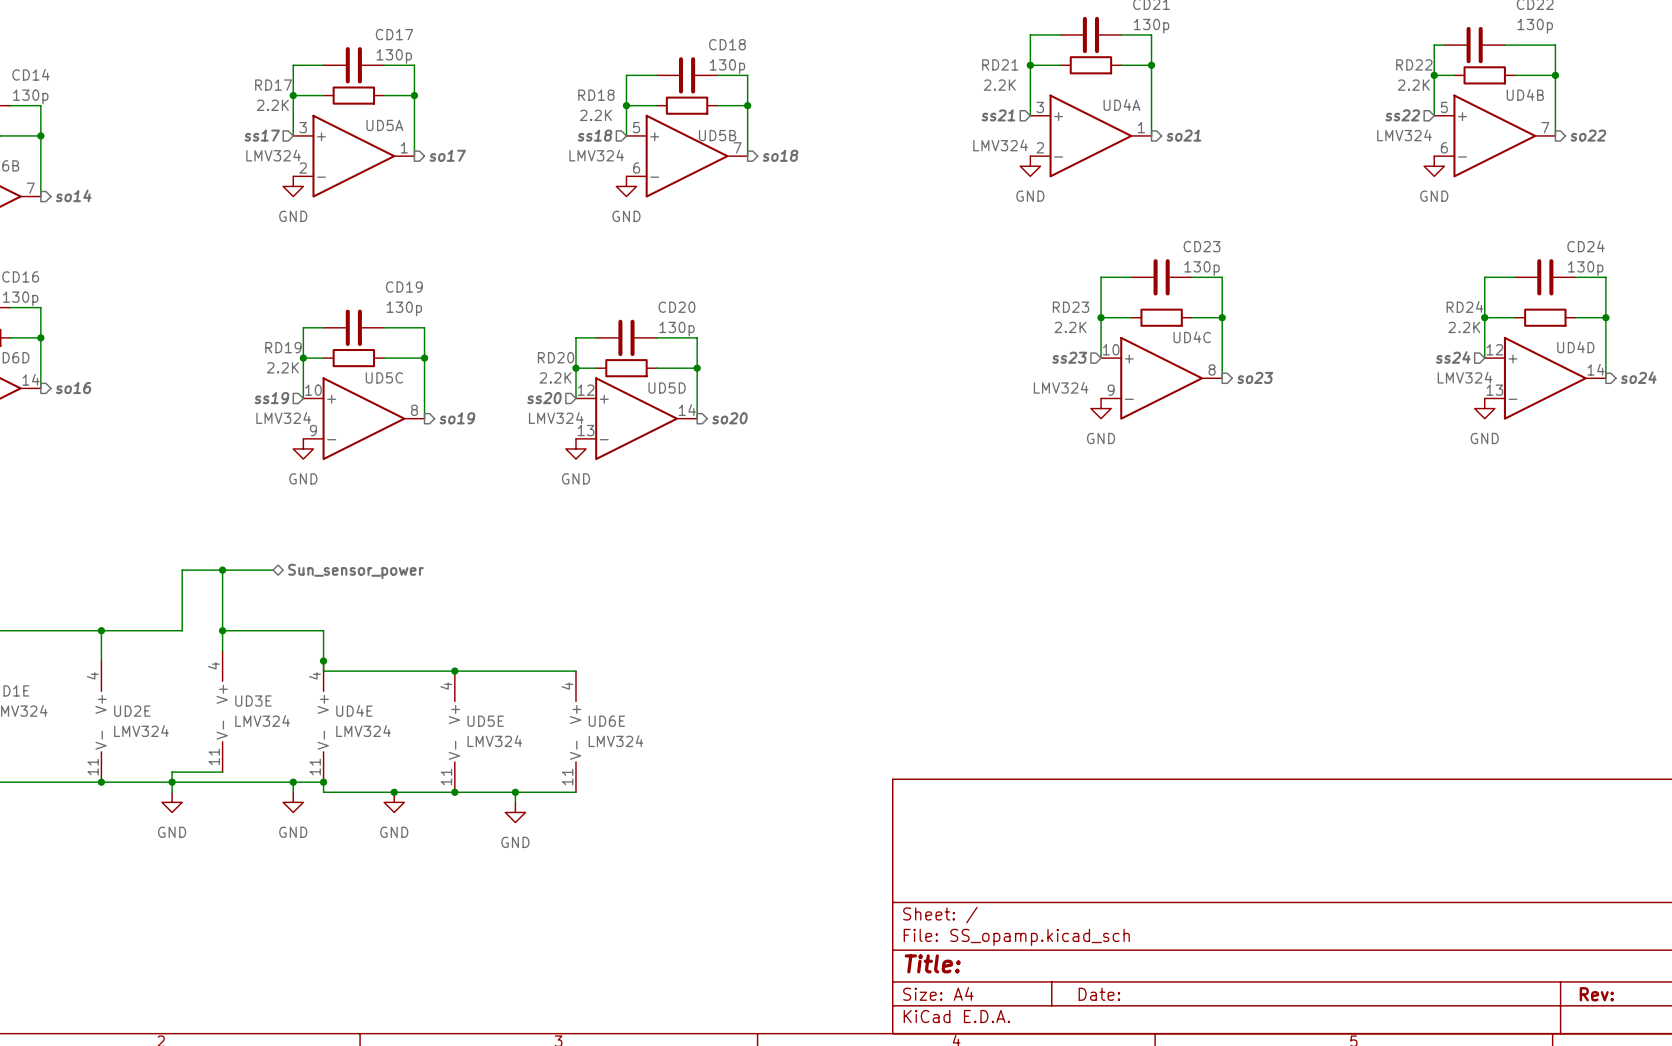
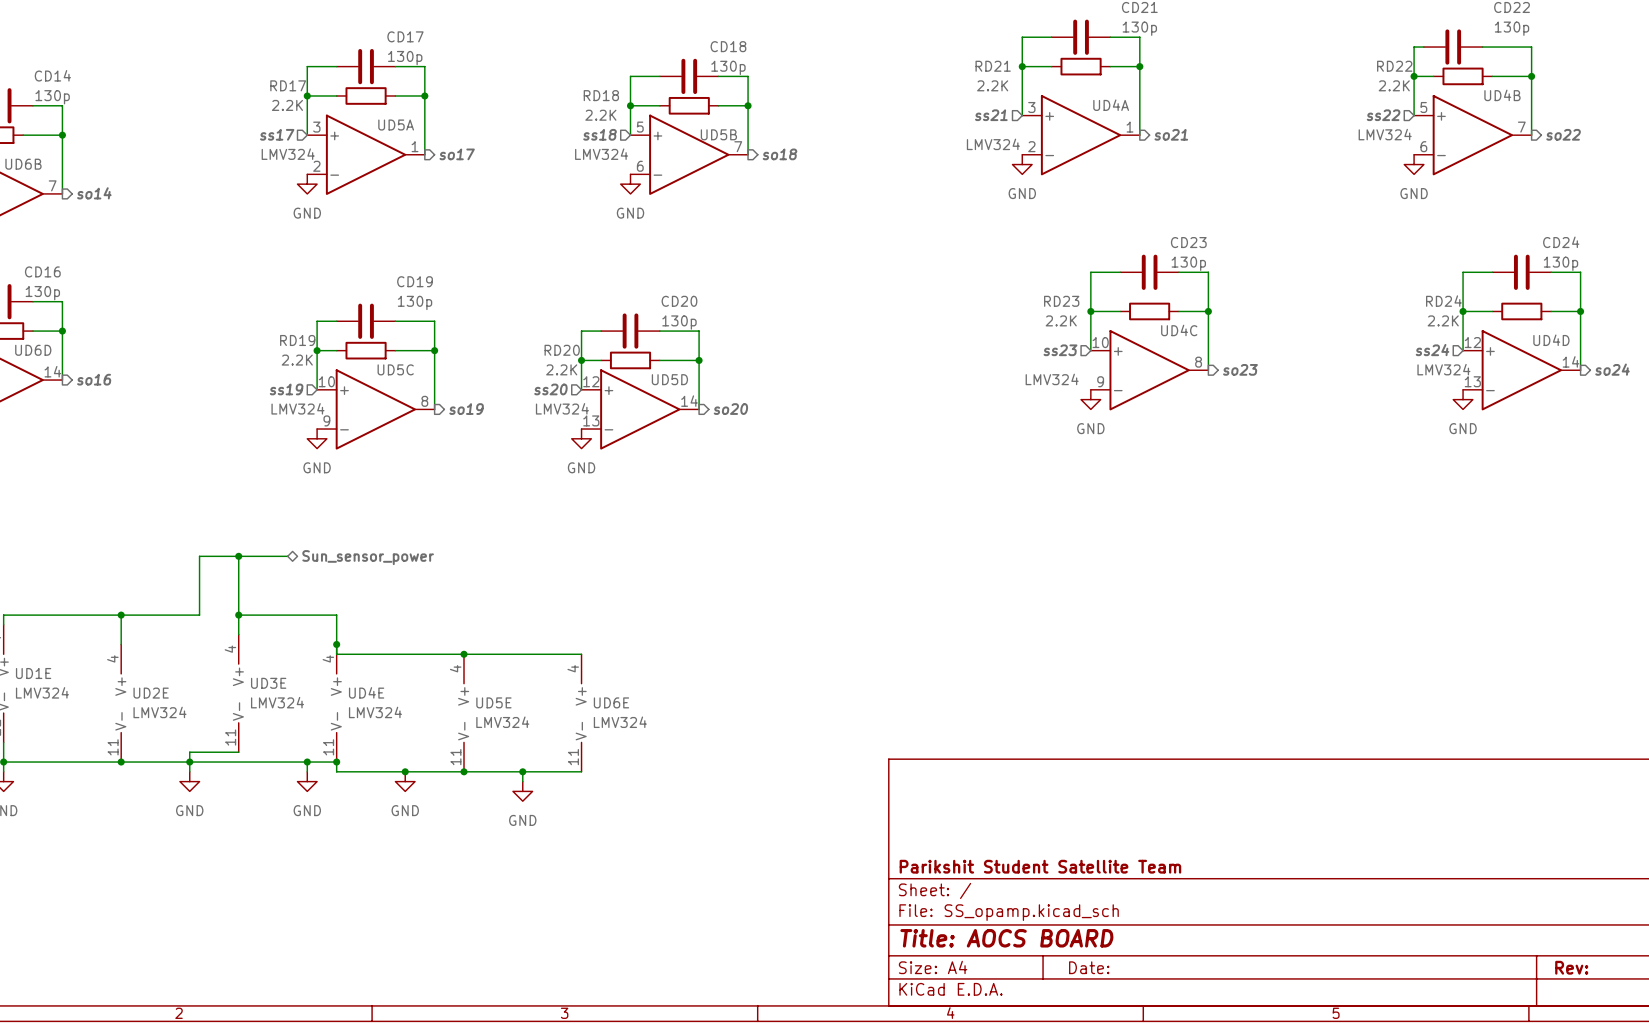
title block: none -> Parikshit Student Satellite Team (1040, 866)
title block: Title: (932, 963) -> Title: AOCS BOARD (1006, 938)

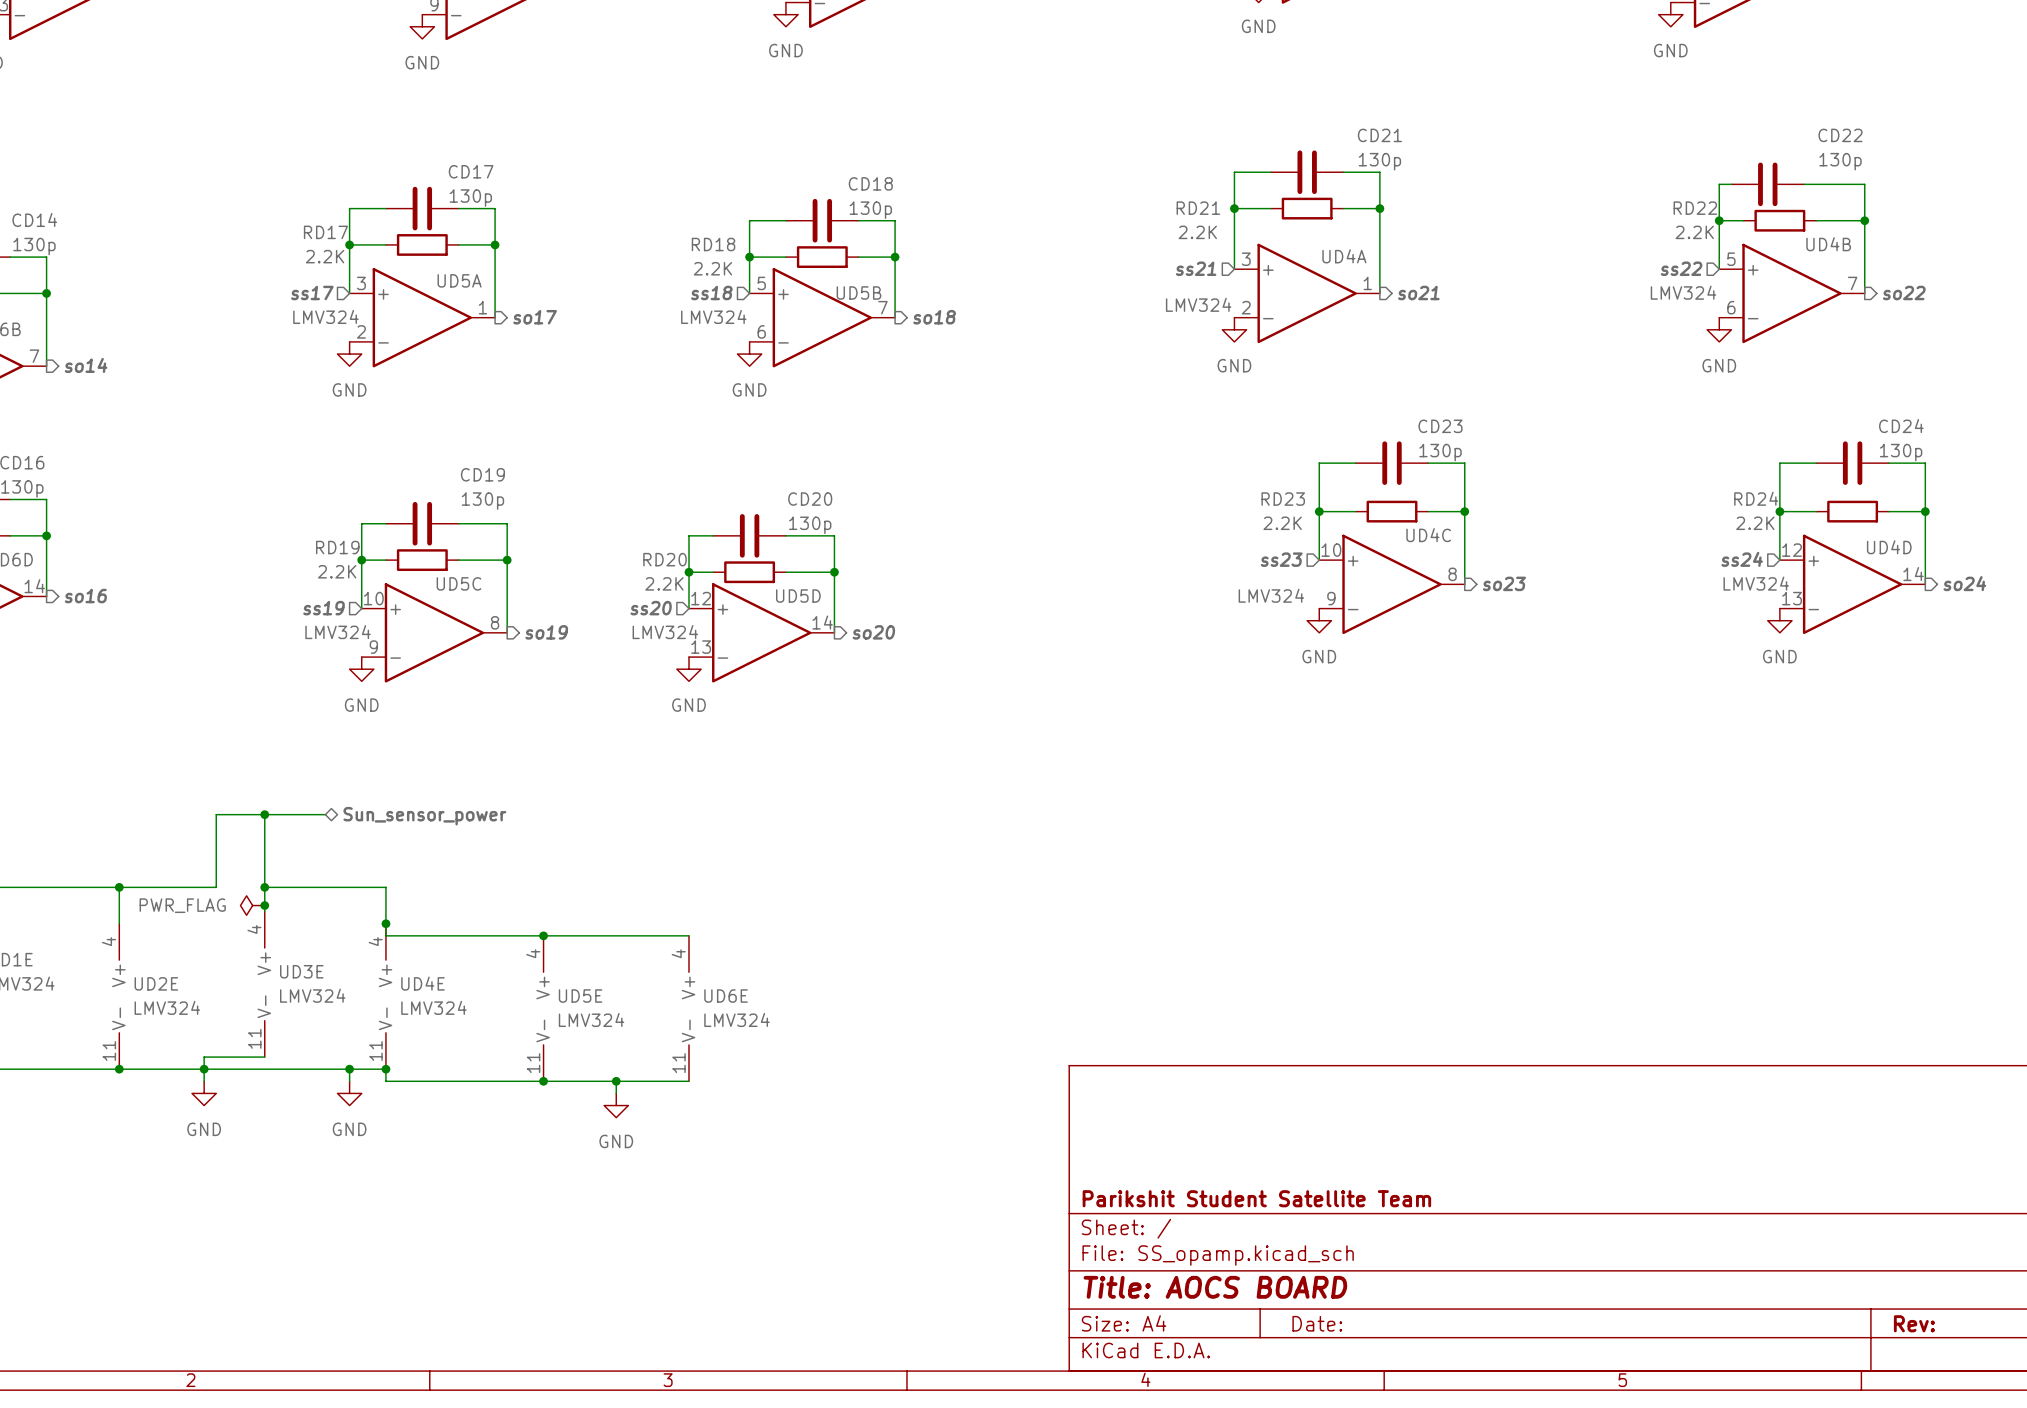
power symbol: none -> PWR_FLAG (252, 905)
junction: none -> (264, 905)
junction: (405, 771) -> none
power symbol: GND (405, 781) -> none

